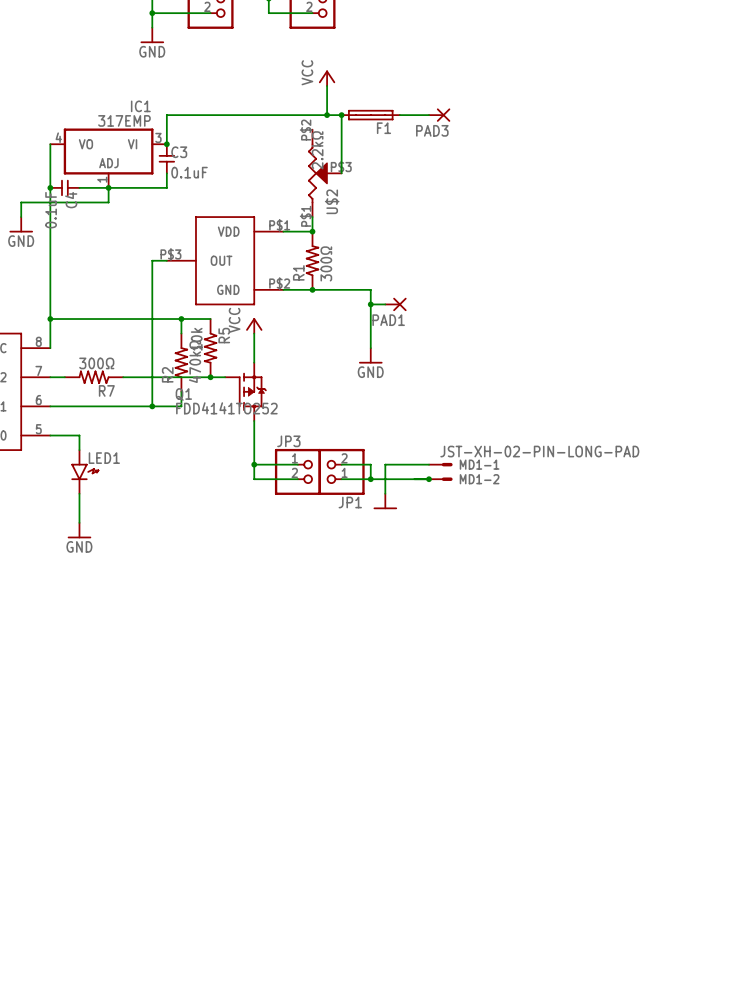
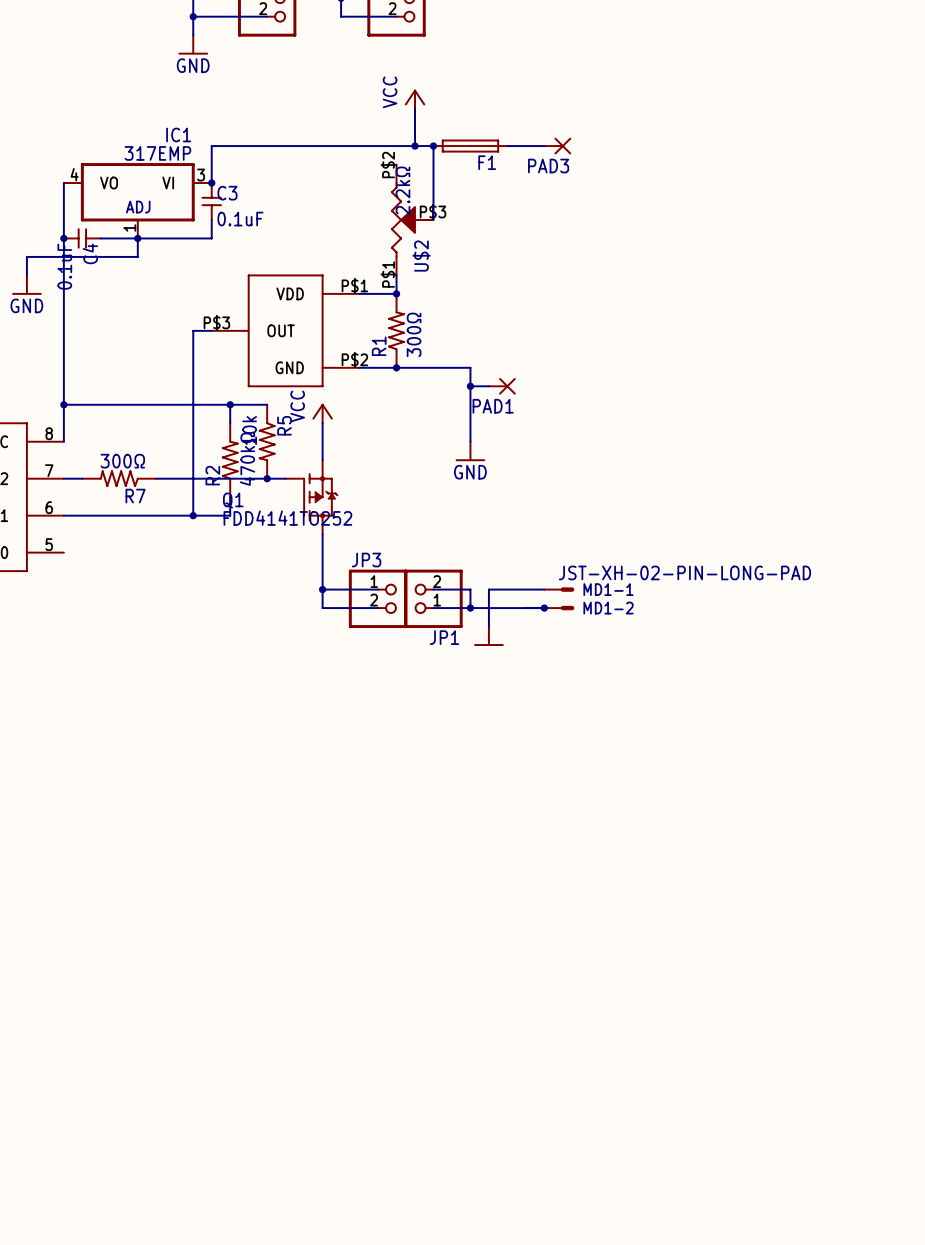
wire: (50, 435) (79, 435) (79, 450) -> none
LED1: (85, 471) -> none
wire: (79, 493) (79, 522) -> none
power symbol: GND (79, 530) -> none

